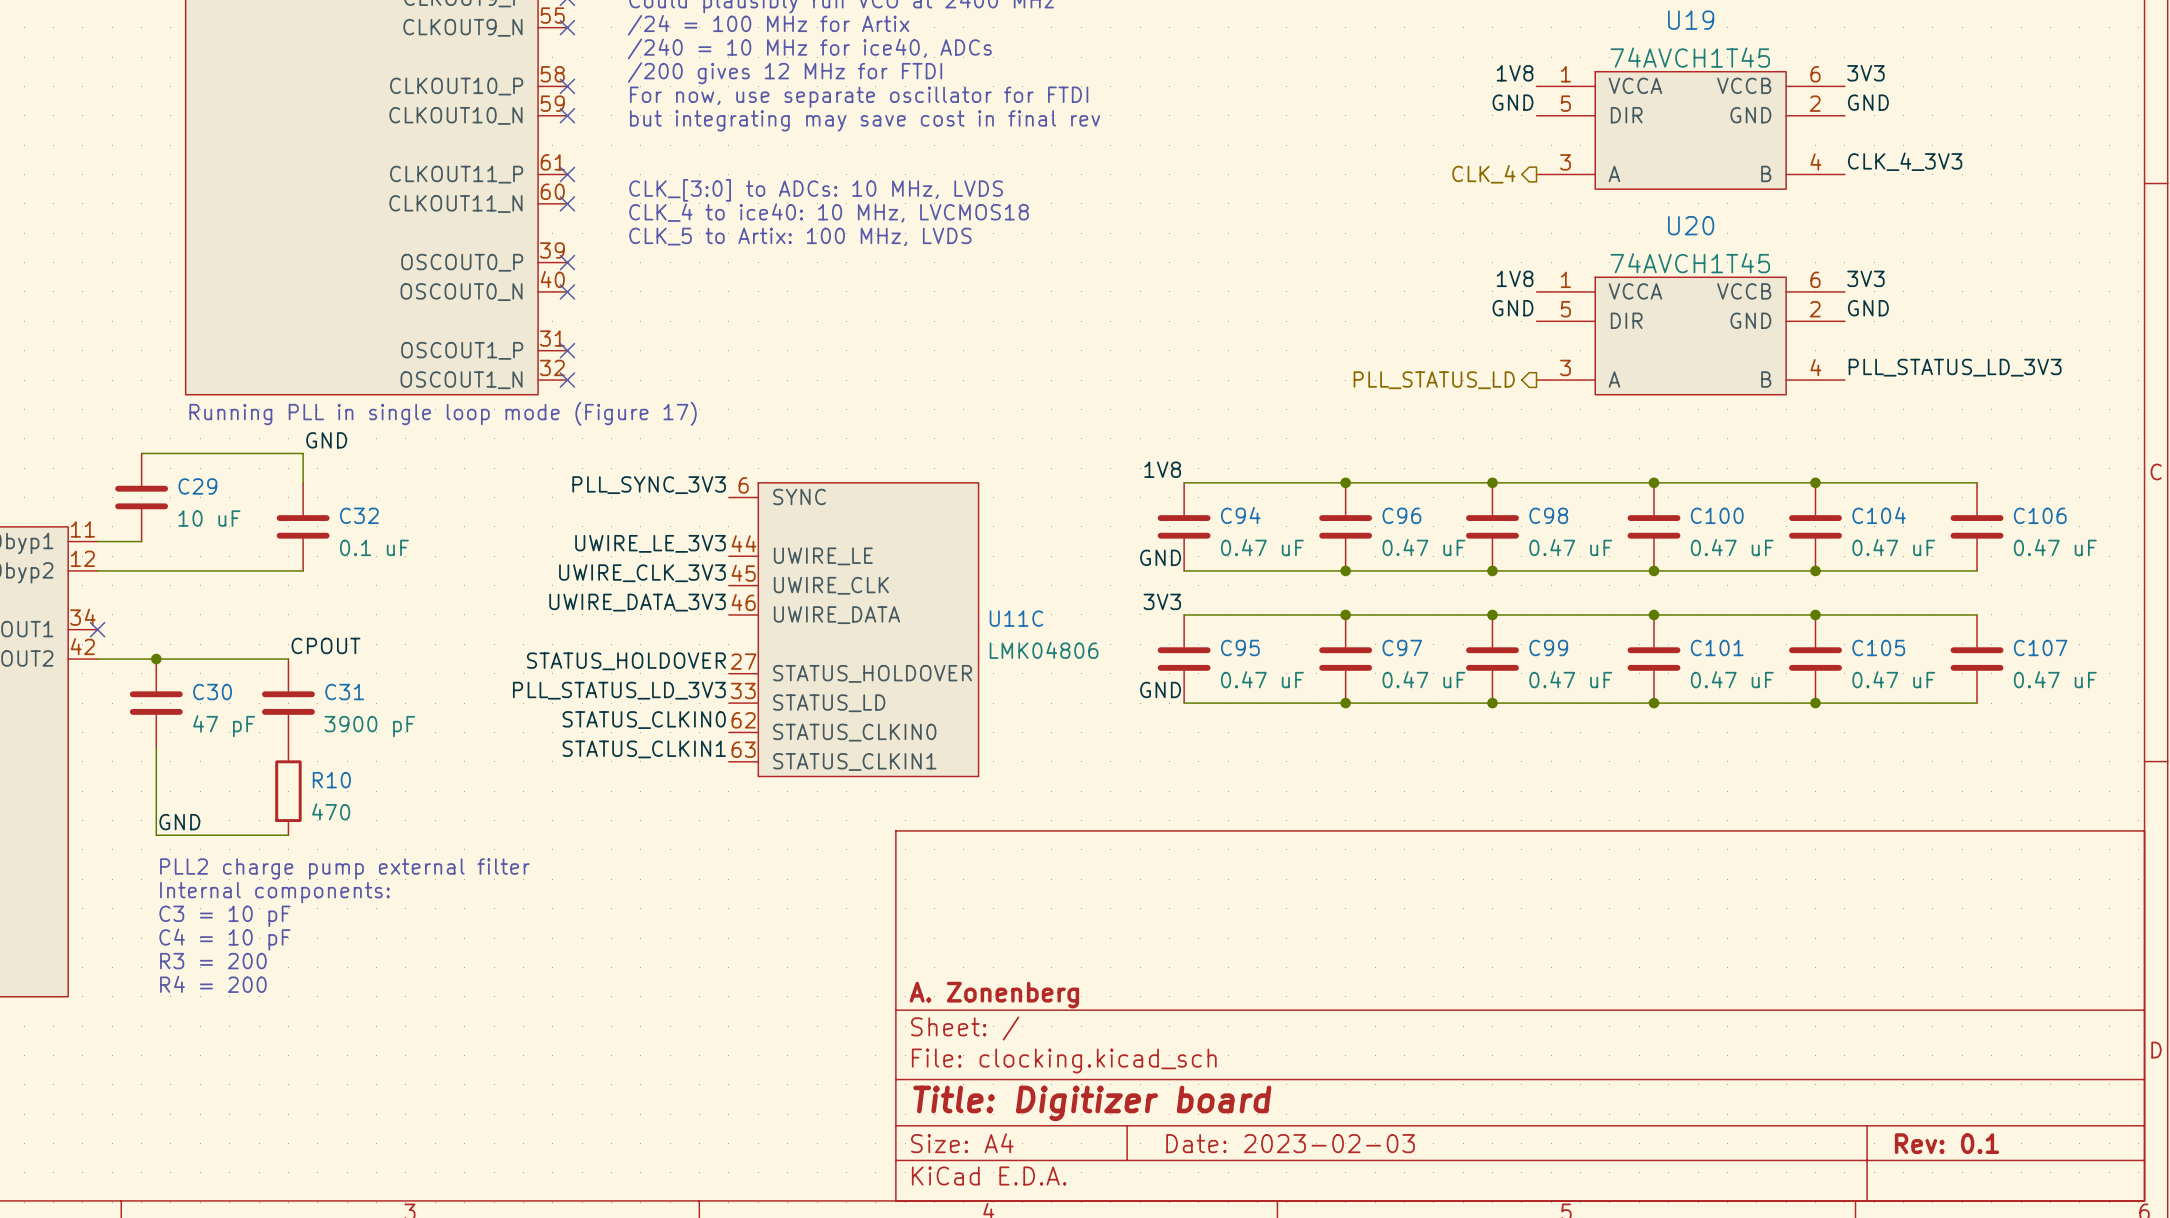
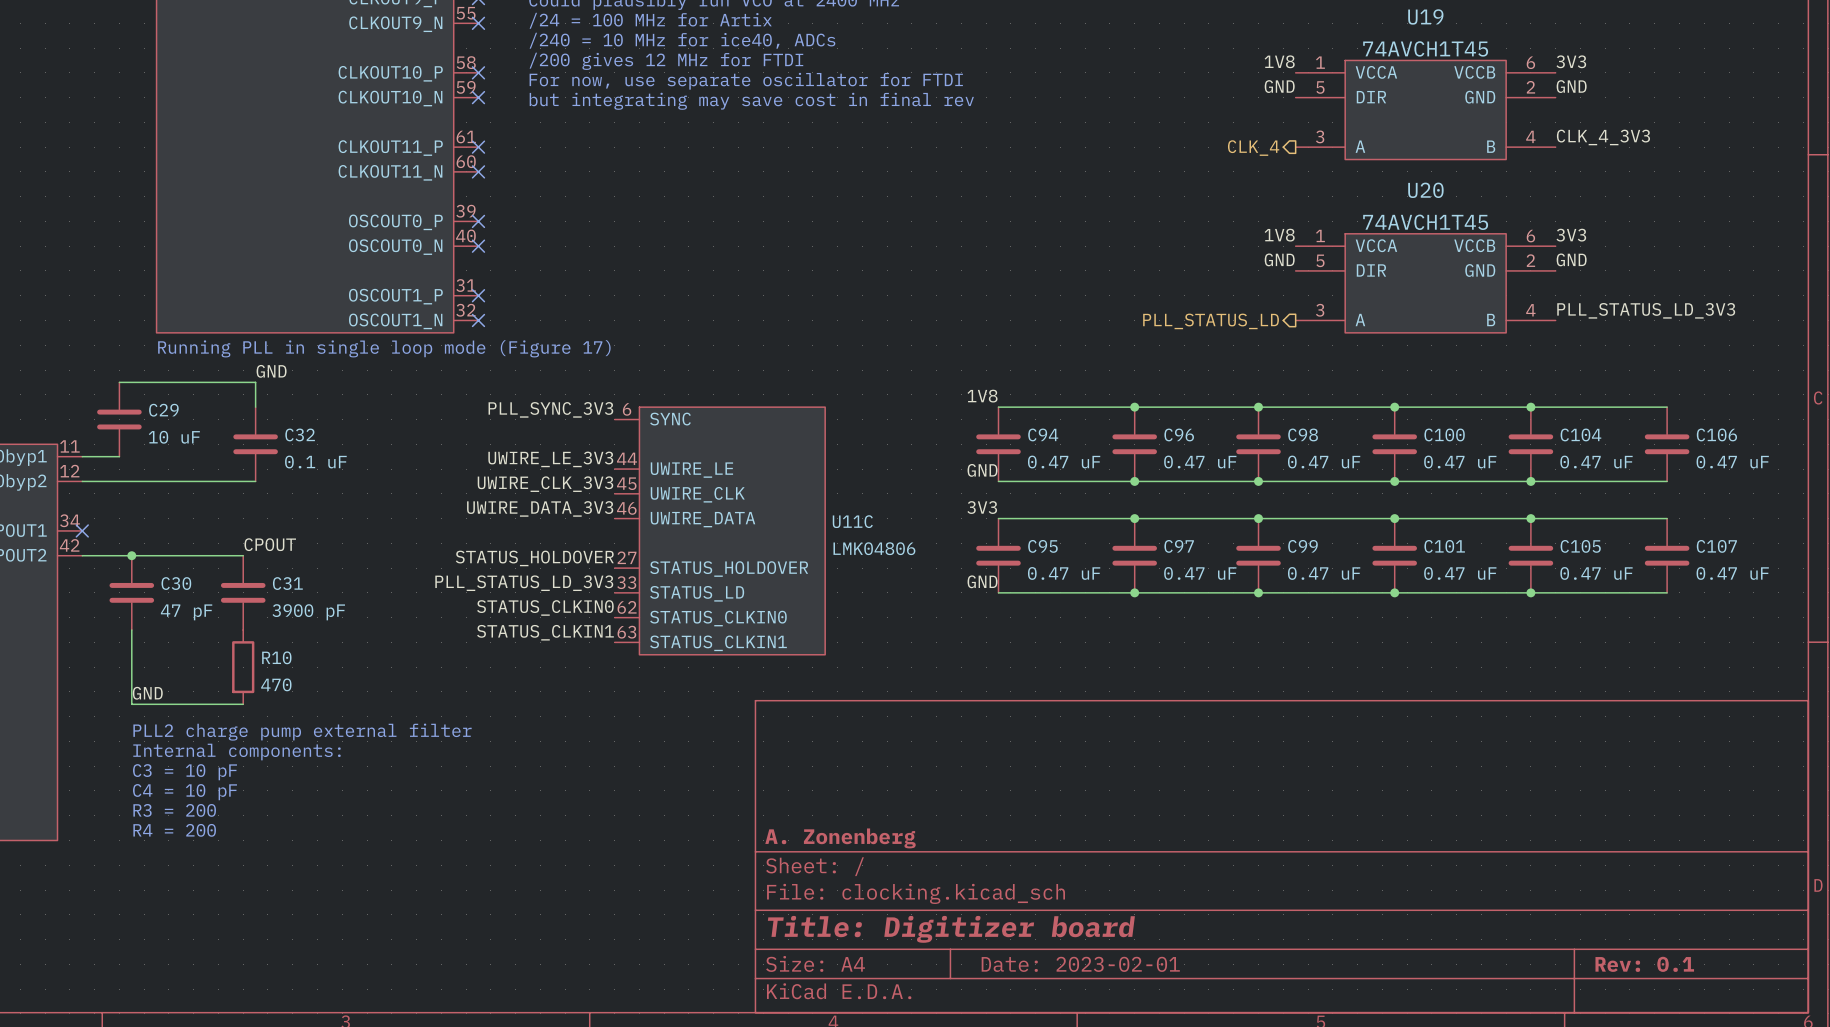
text: CLK_[3:0] to ADCs: 10 MHz, LVDS (816, 190) -> none
text: CLK_4 to ice40: 10 MHz, LVCMOS18 (829, 212) -> none
text: CLK_5 to Artix: 100 MHz, LVDS (800, 236) -> none
title block: Date: 2023-02-03 (1290, 1143) -> Date: 2023-02-01 (1080, 964)

